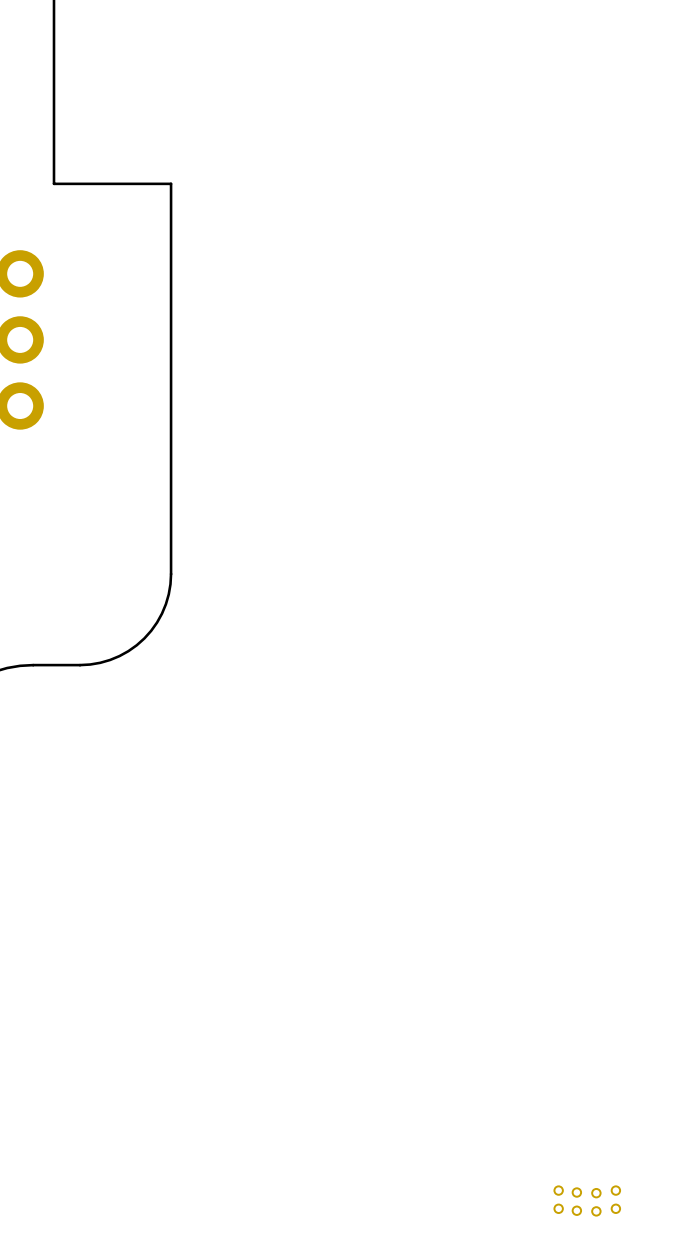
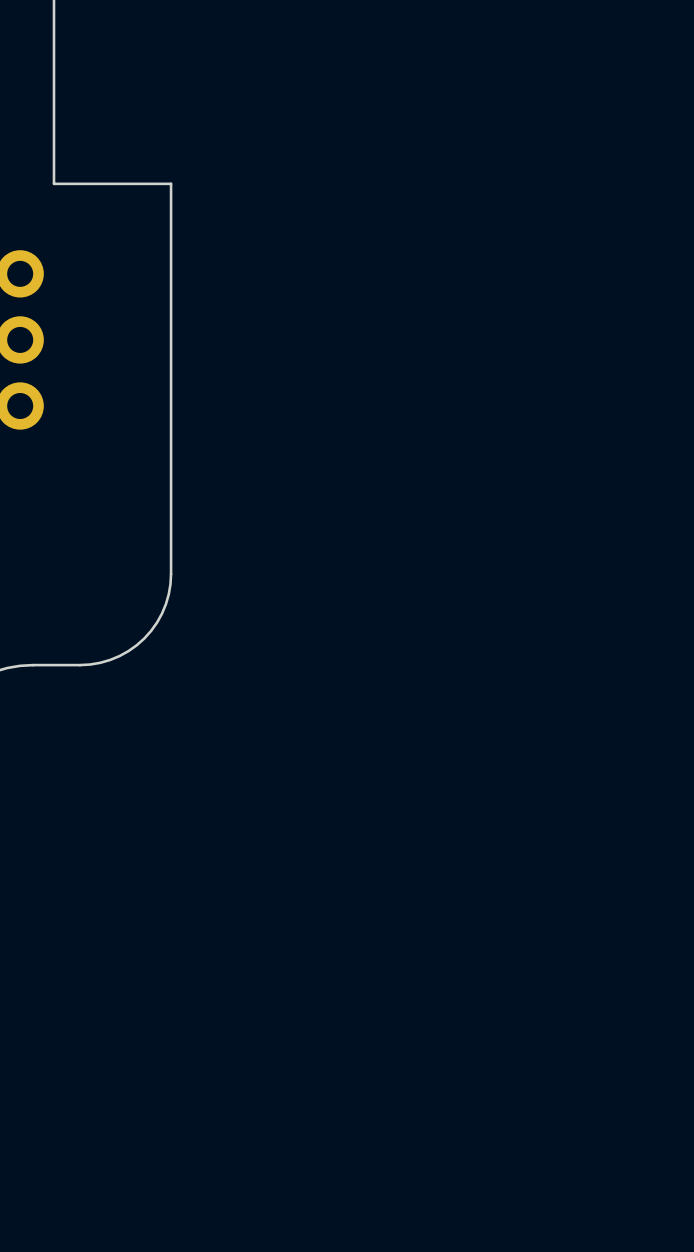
part: (587, 1200) -> none

